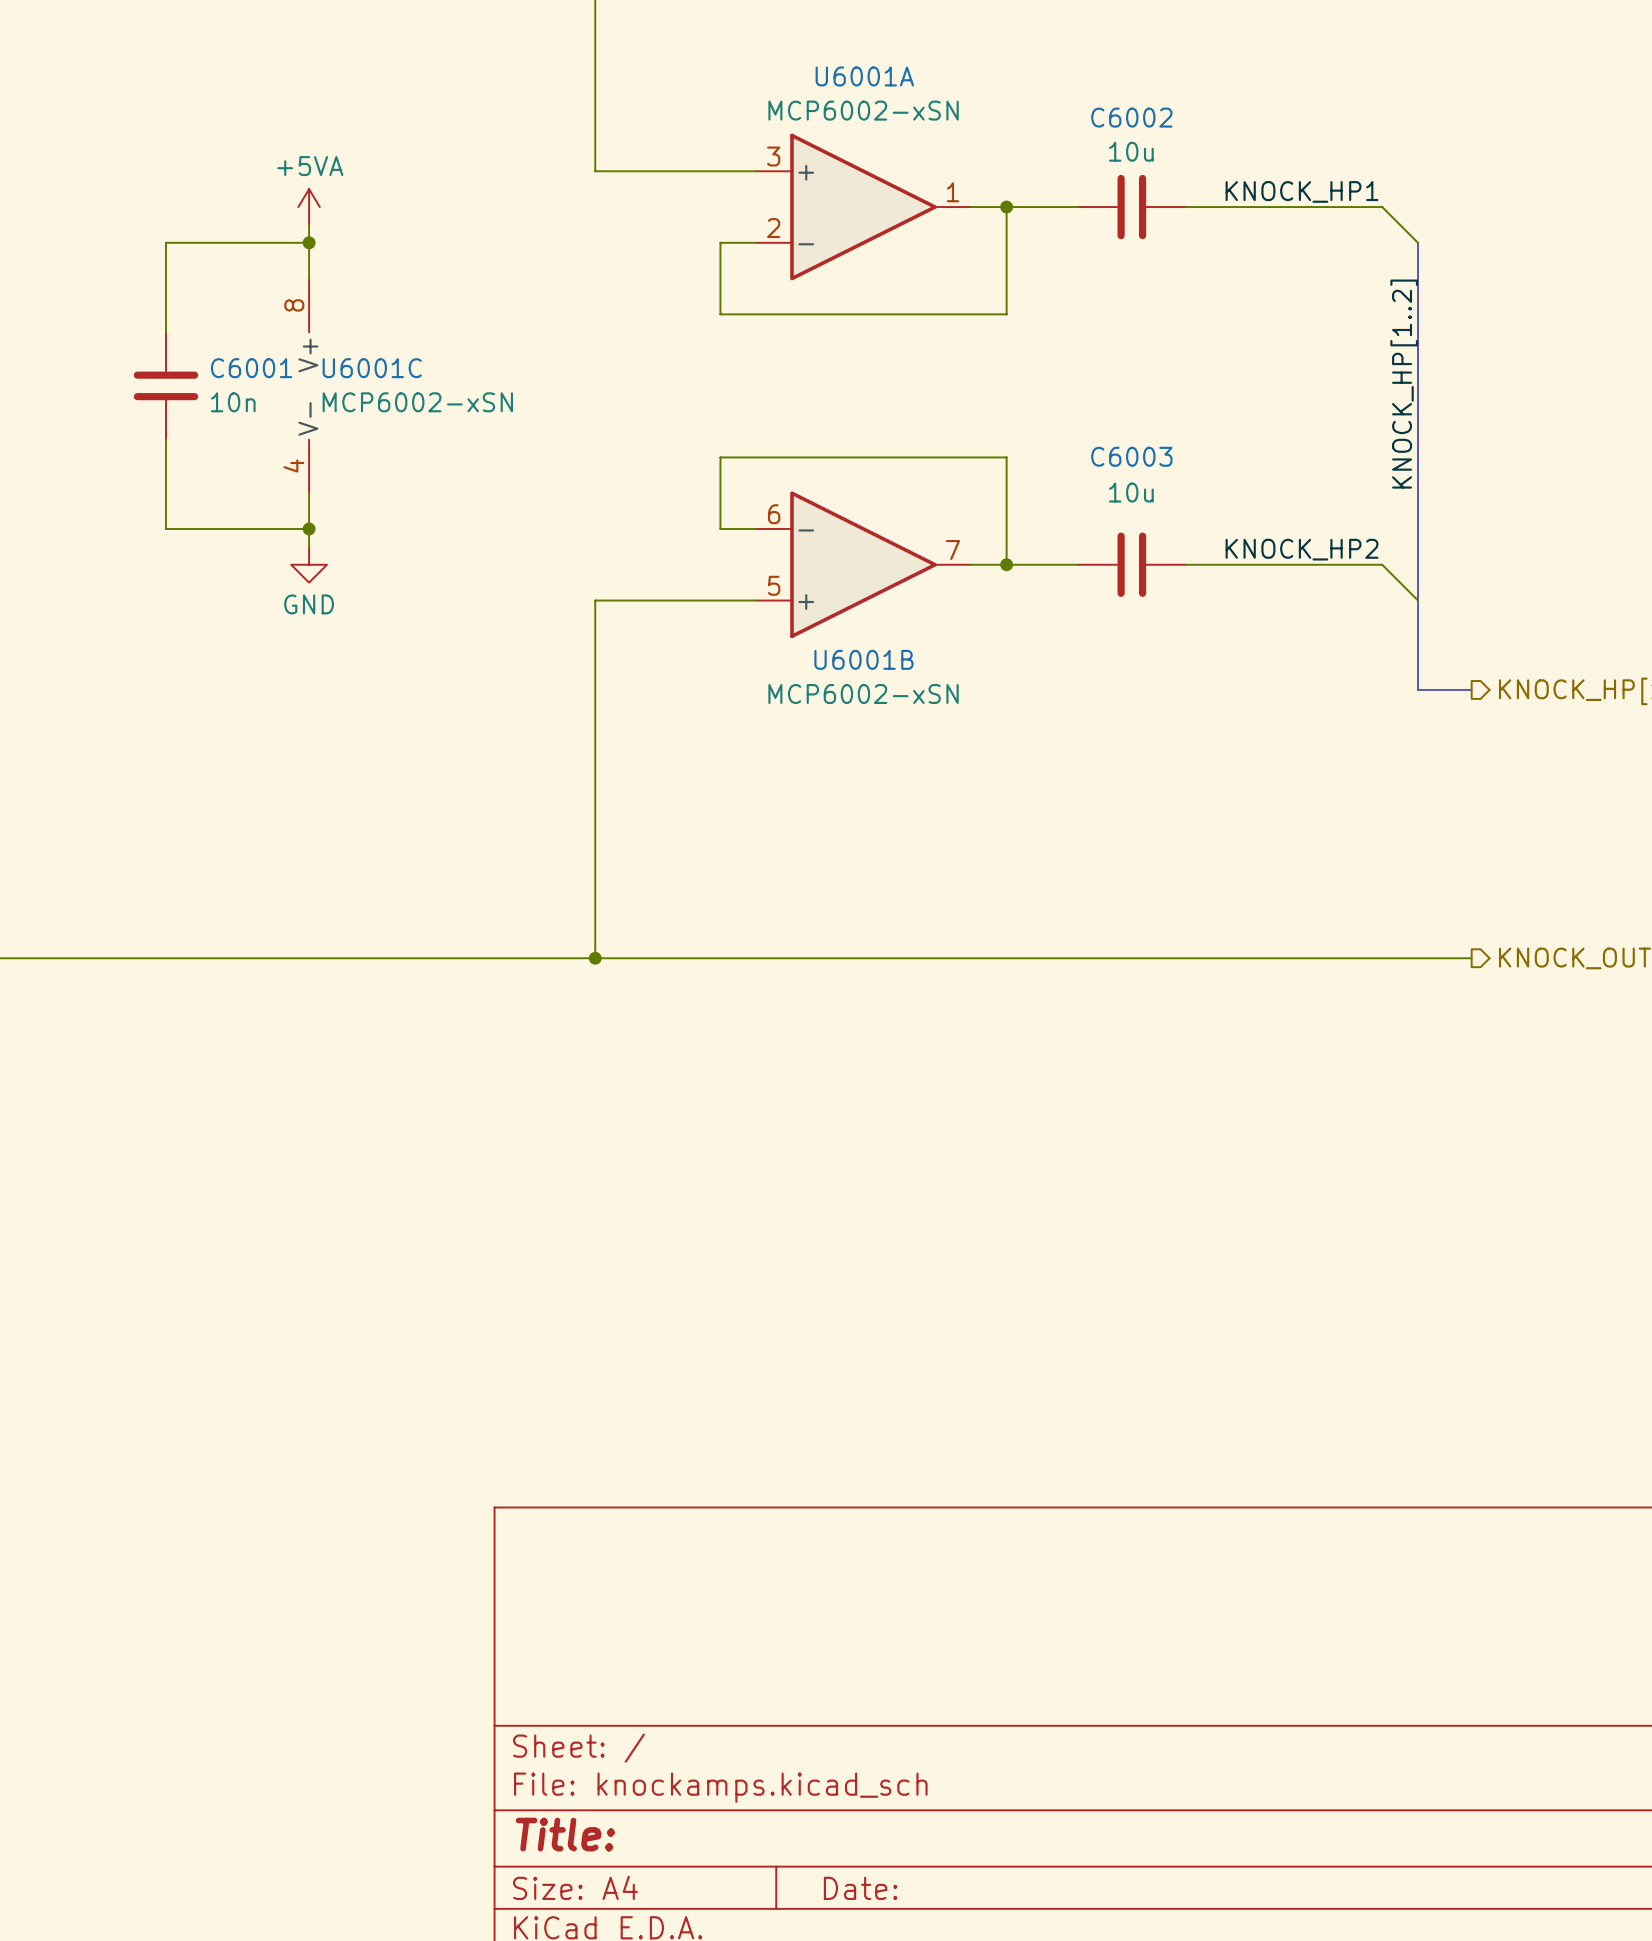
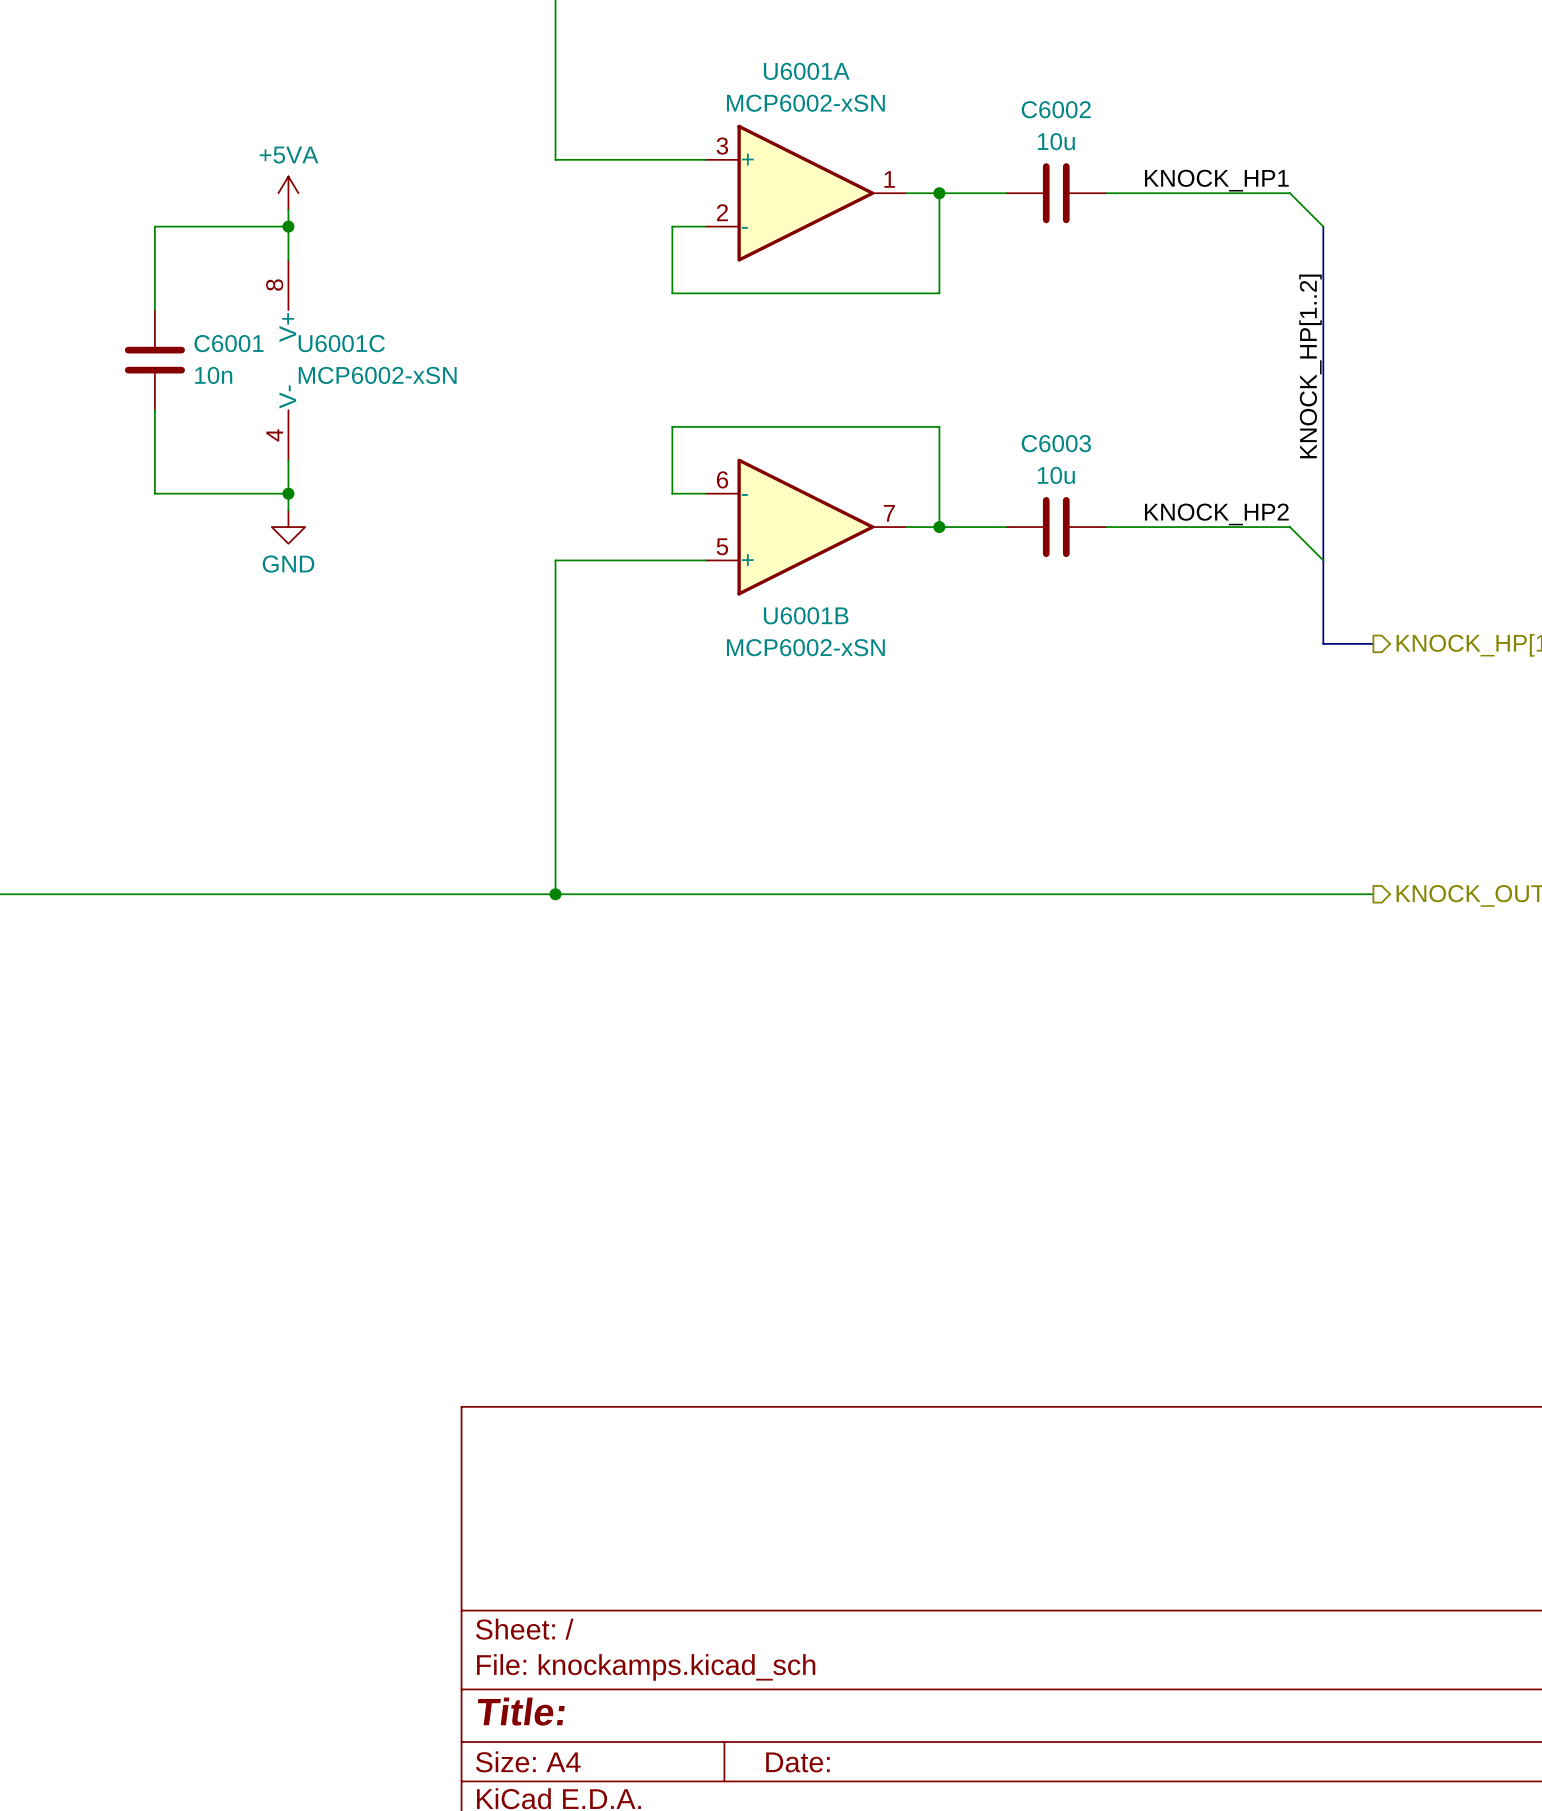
C6003 name position: C6003 (1131, 456) -> C6003 (1056, 443)
C6003 value position: 10u (1131, 492) -> 10u (1056, 475)

